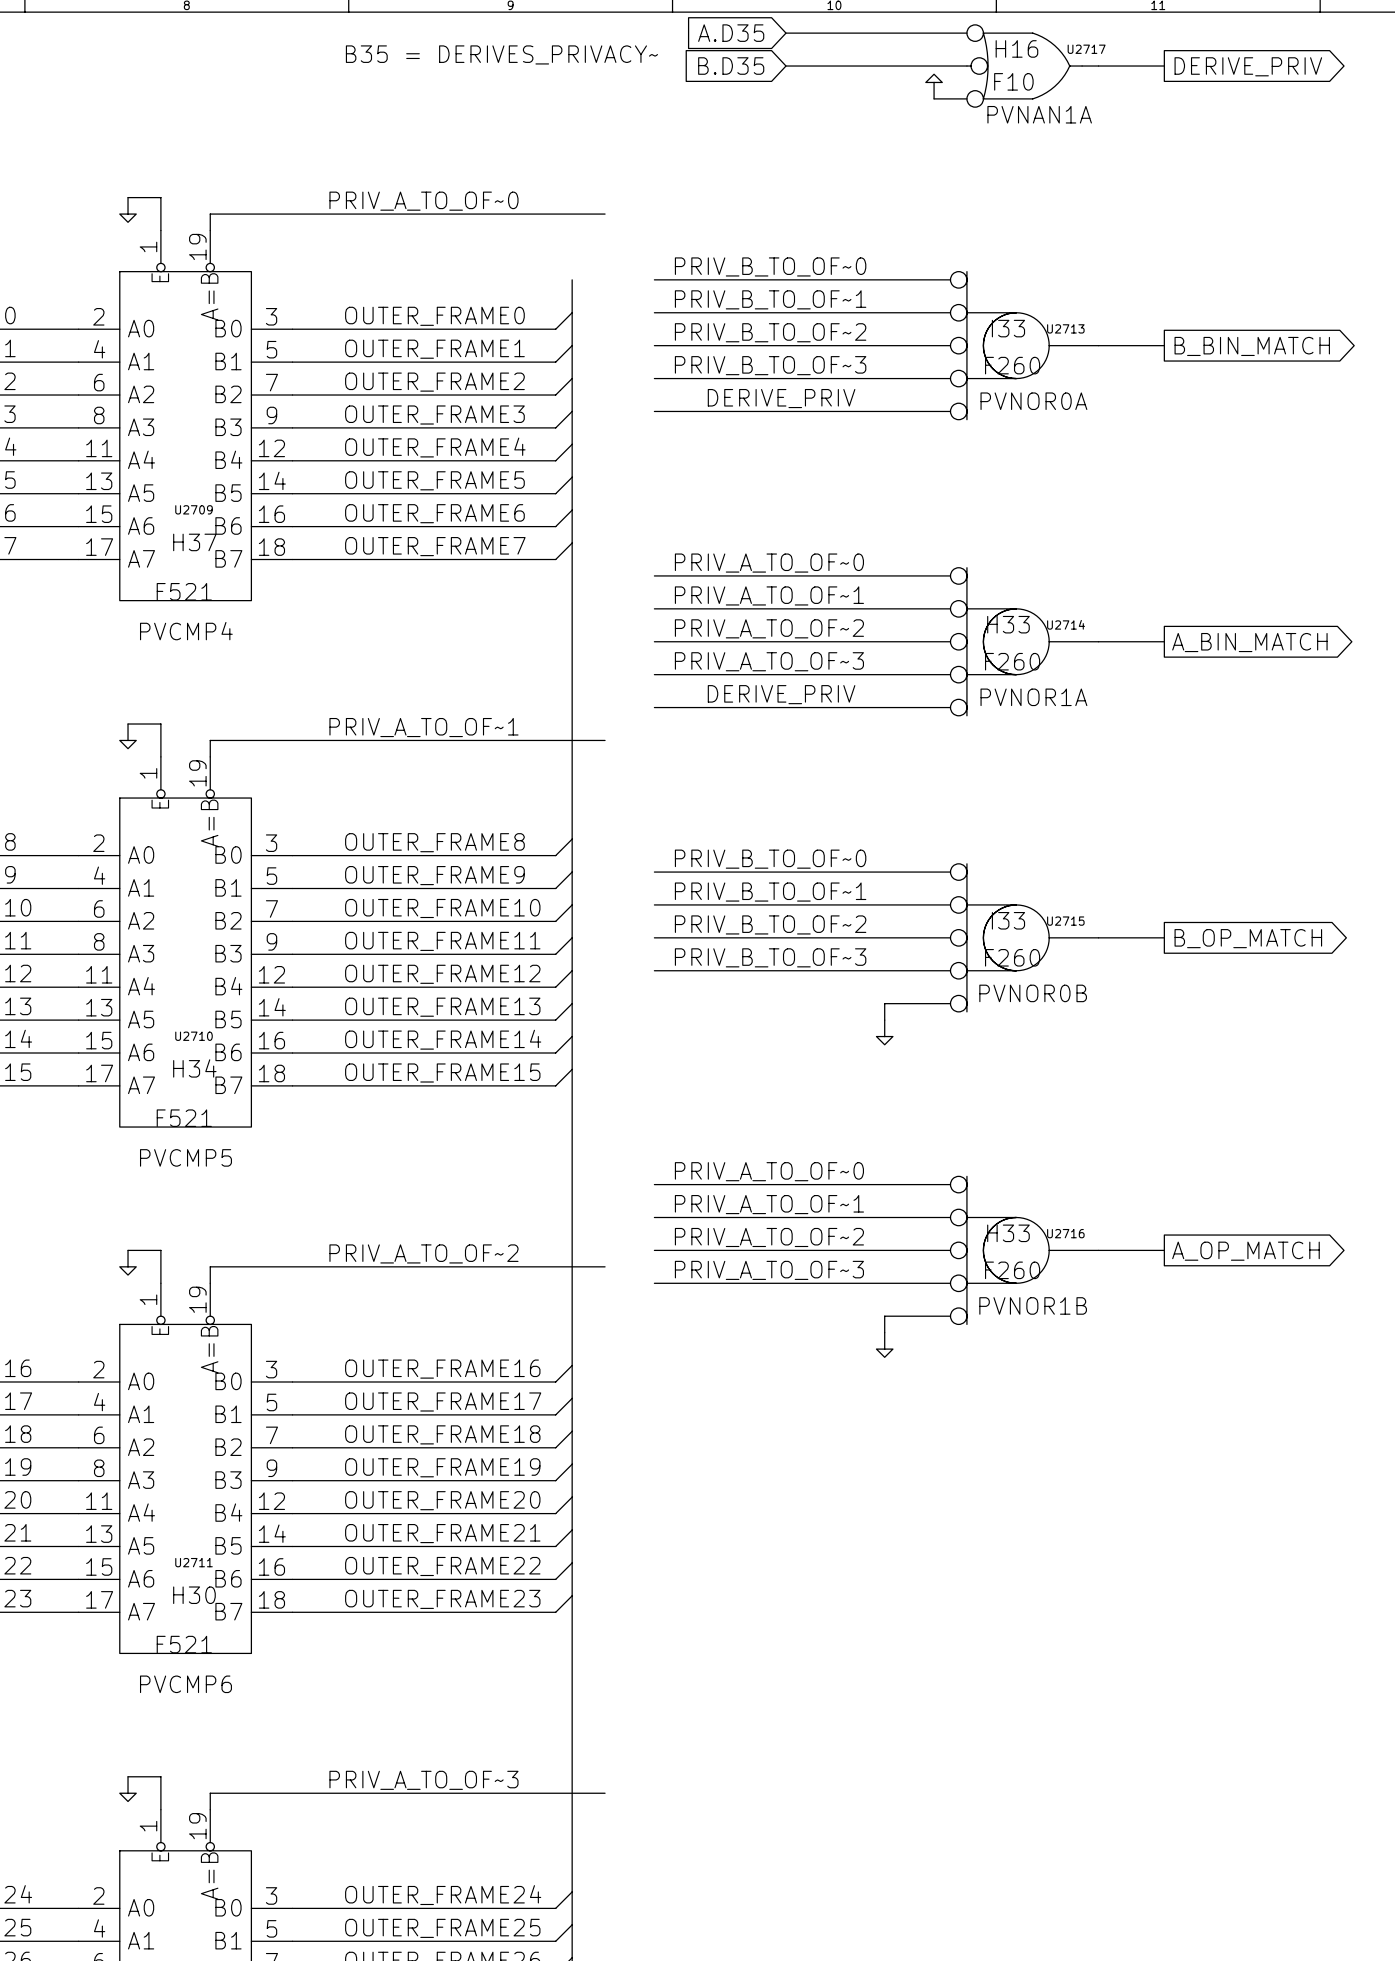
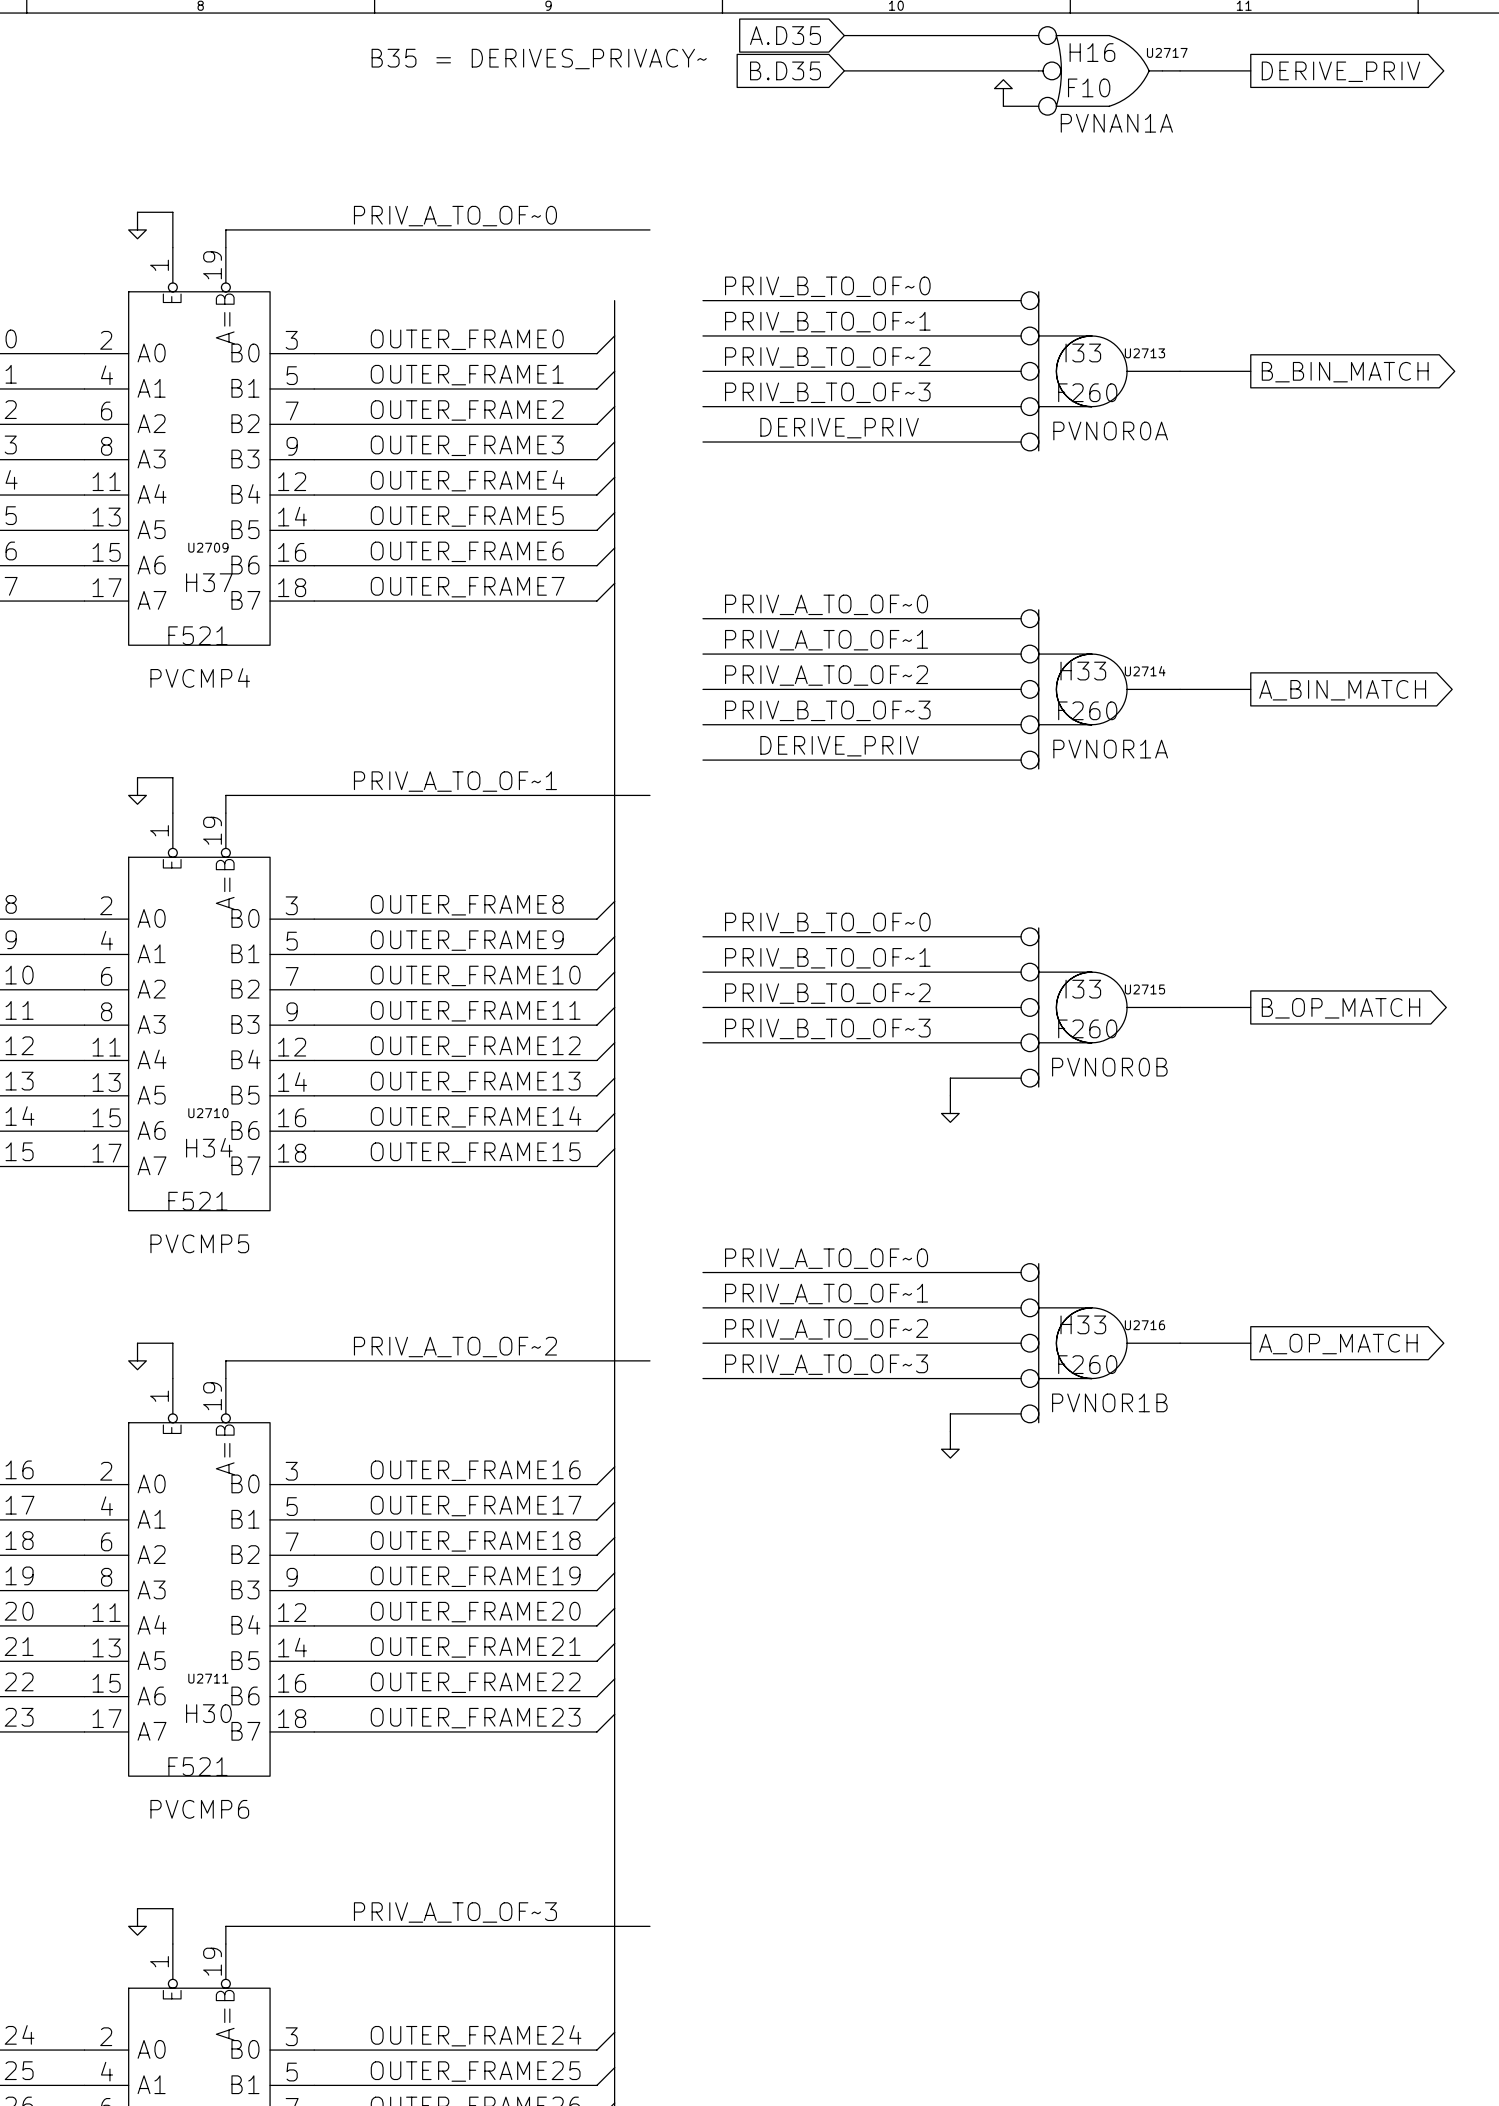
label: PRIV_A_TO_OF~3 (769, 661) -> PRIV_B_TO_OF~3 (827, 710)

